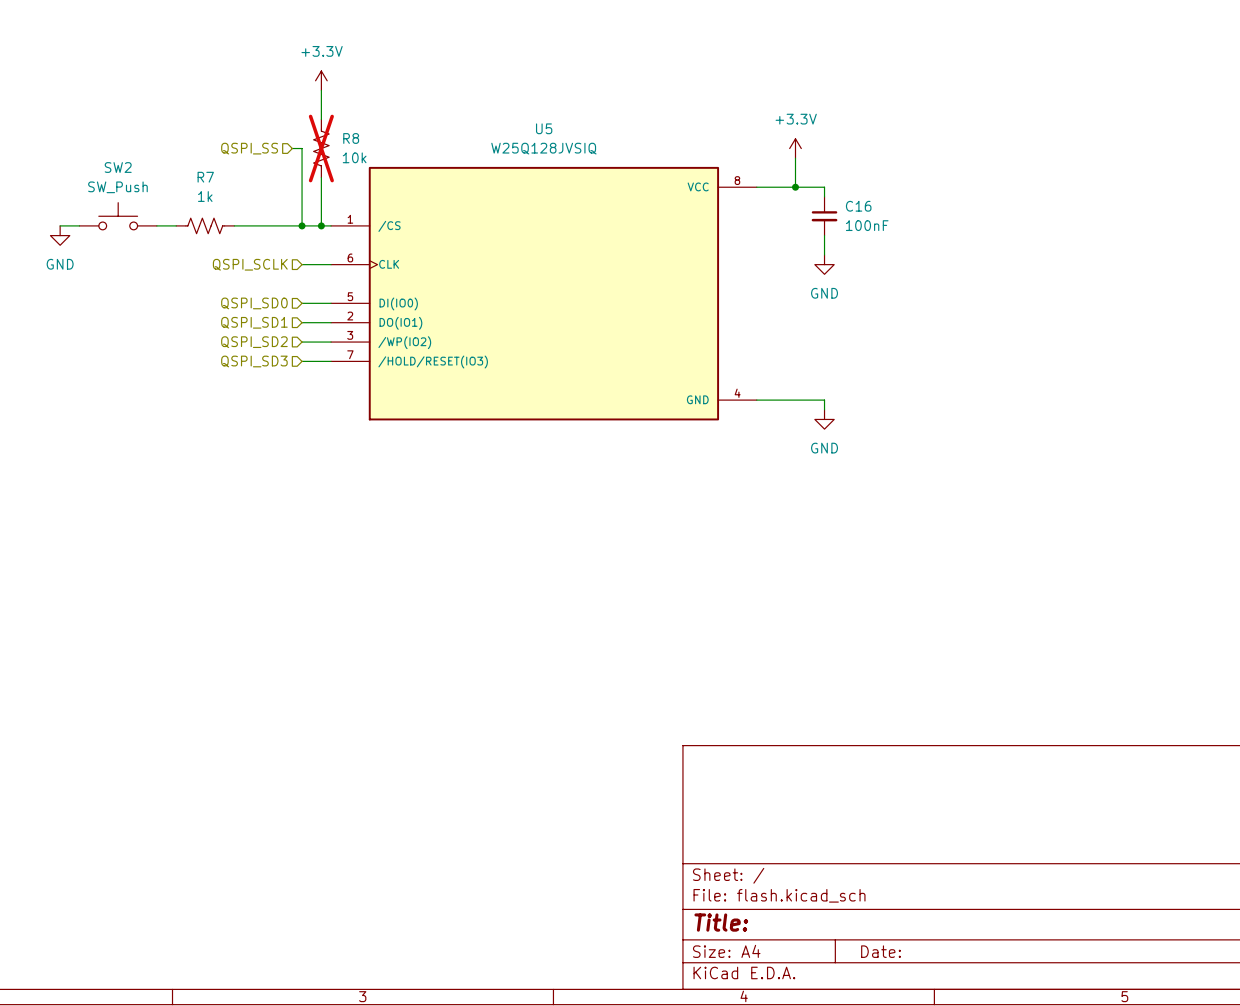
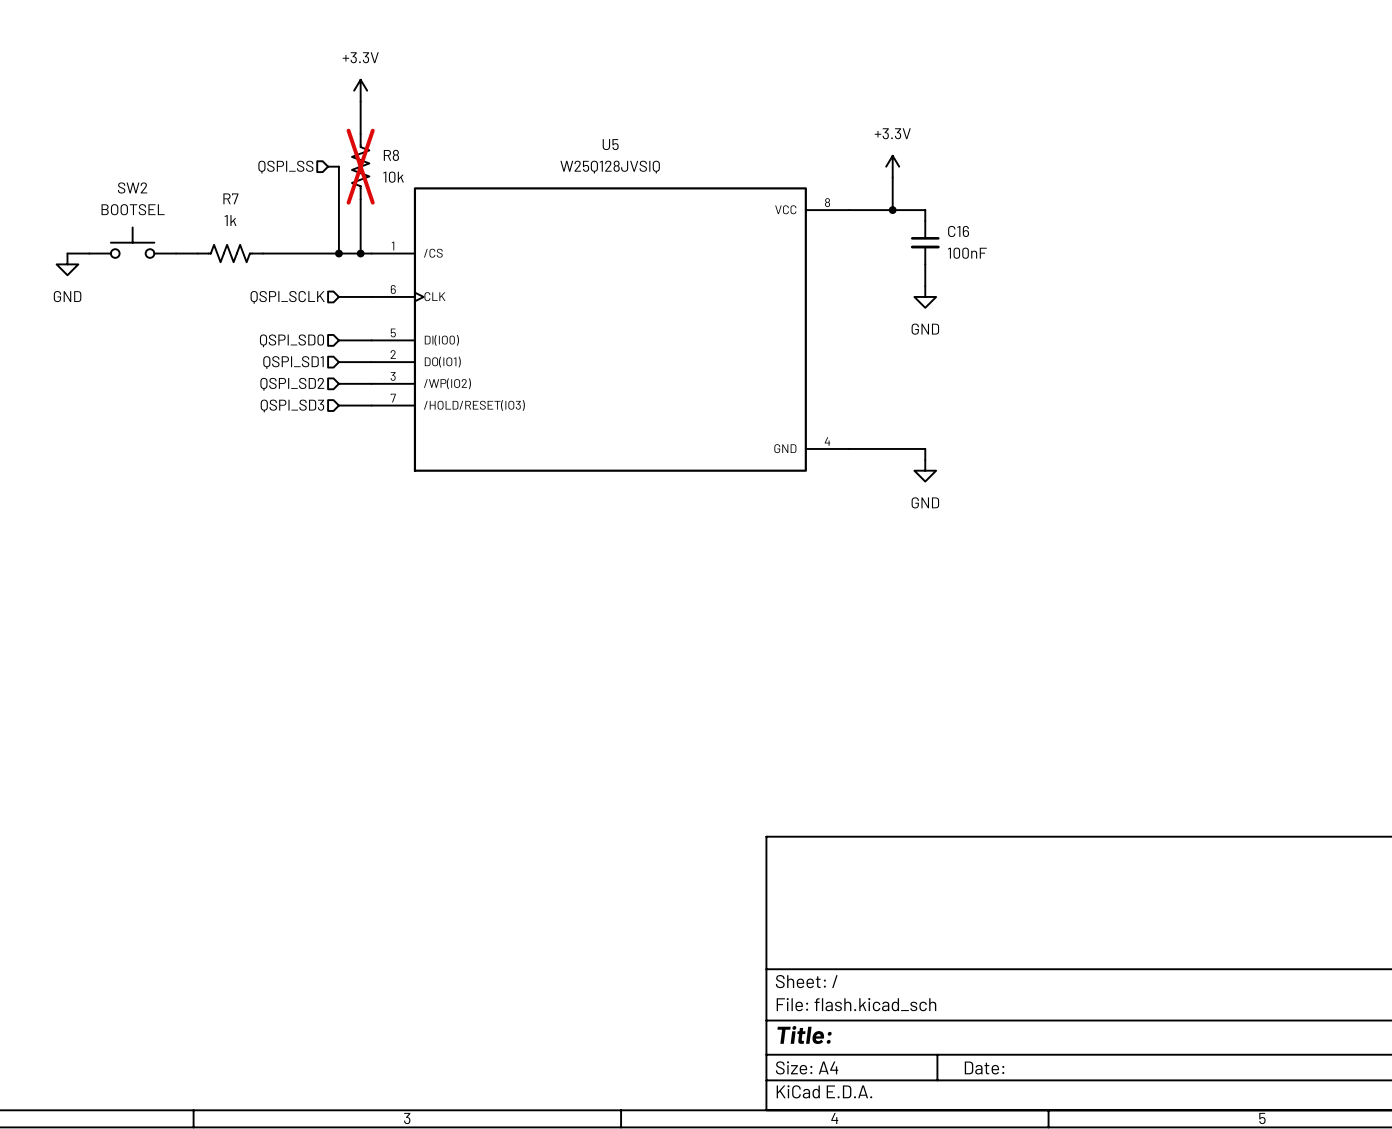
SW2 value: SW_Push (117, 187) -> BOOTSEL (133, 209)

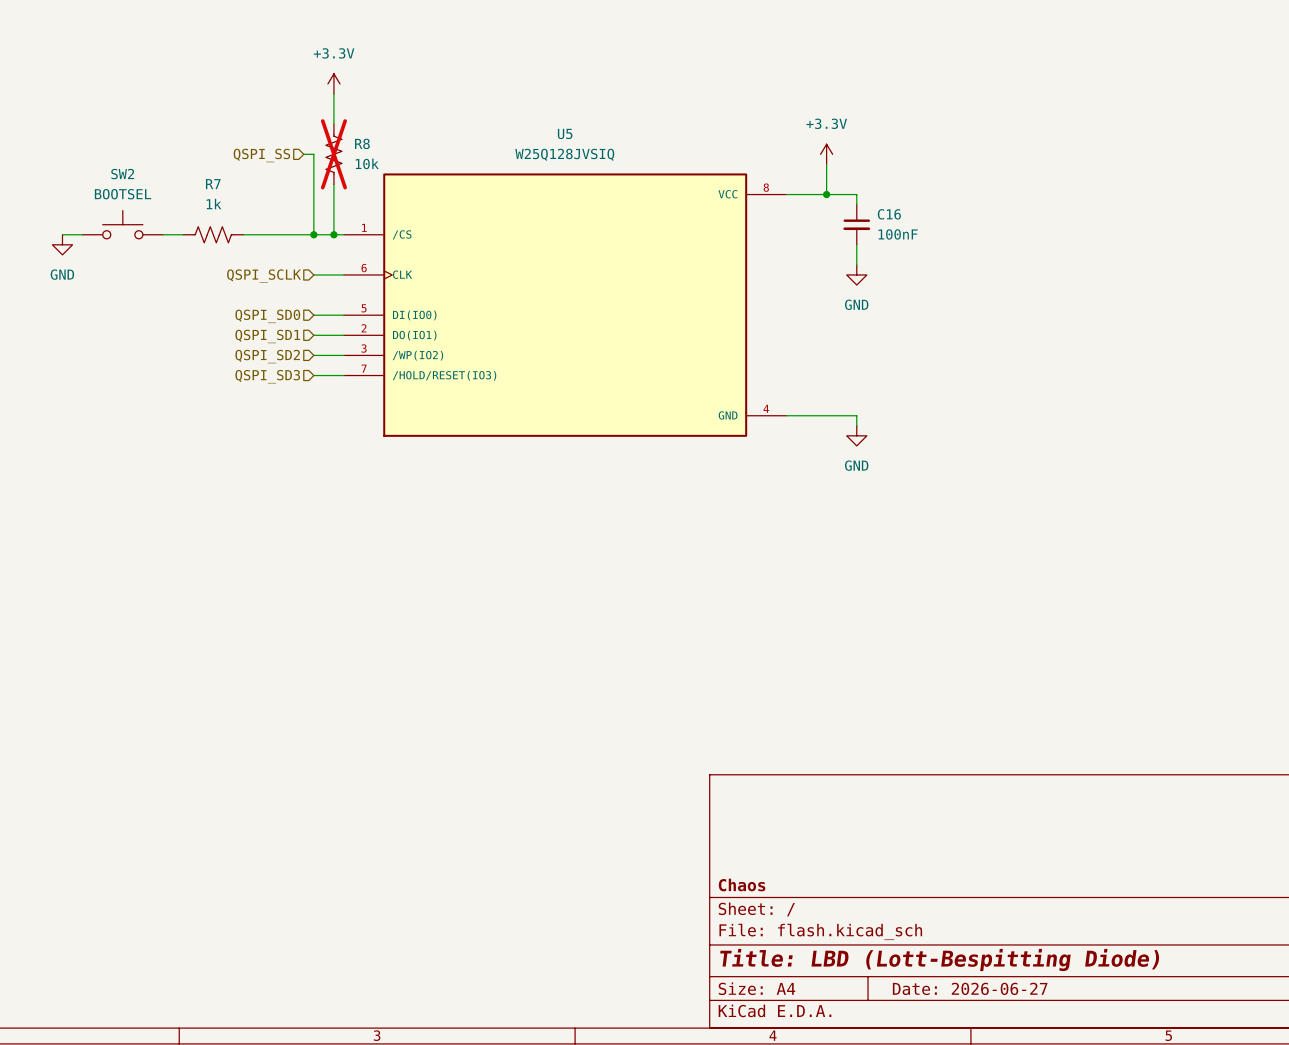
title block: none -> Chaos (742, 885)
title block: Title: (804, 1035) -> Title: LBD (Lott-Bespitting Diode) (939, 959)
title block: Date: (984, 1068) -> Date: 2026-06-27 (970, 988)

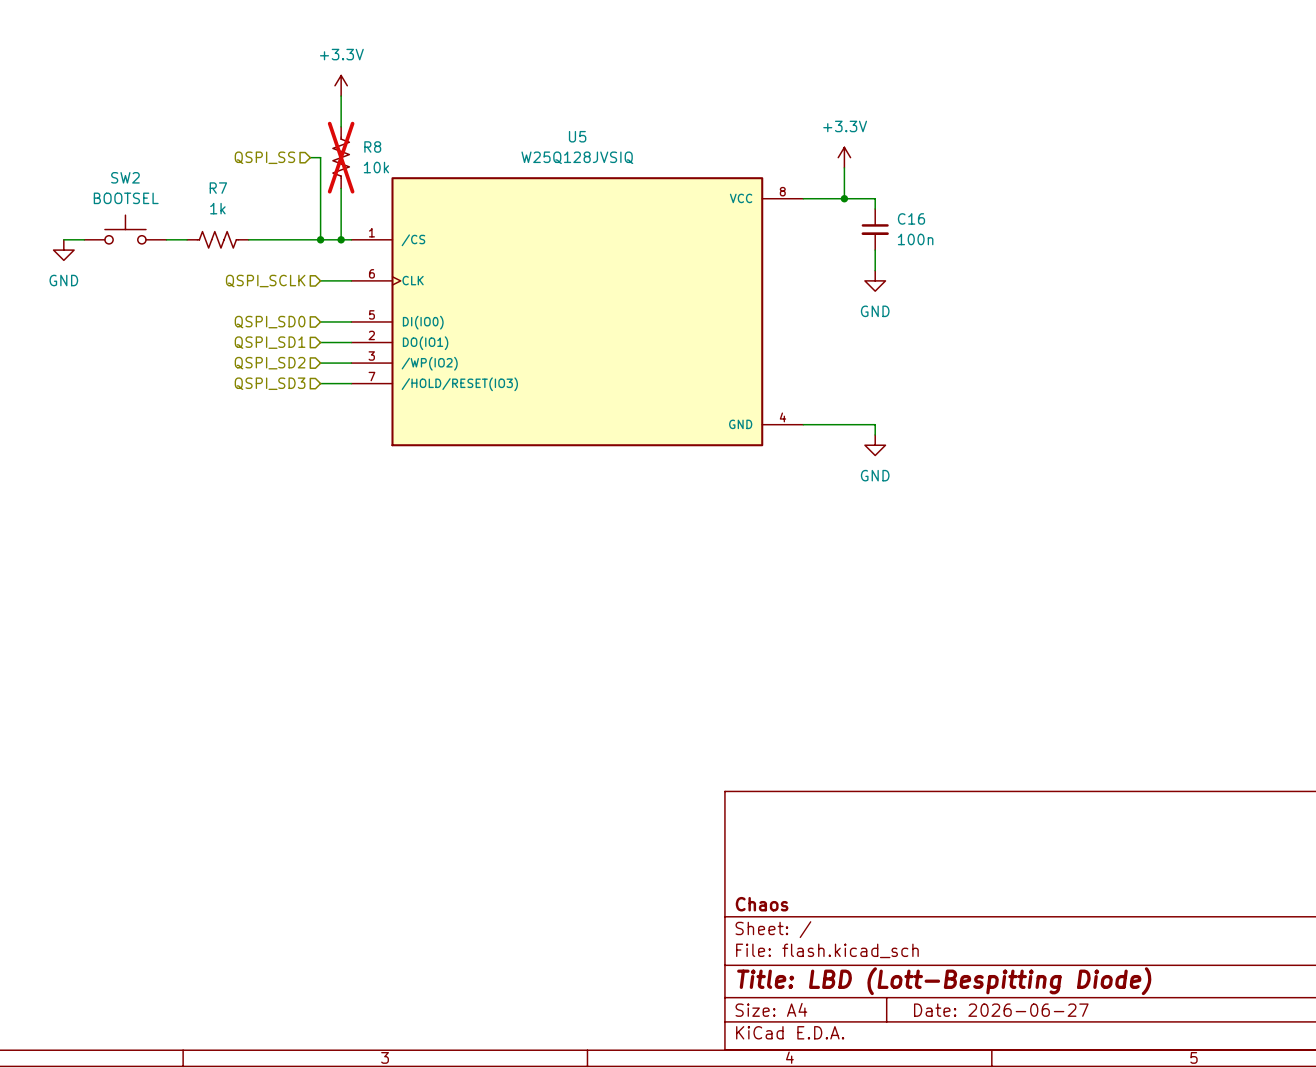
C16 value: 100nF (898, 234) -> 100n (915, 239)

